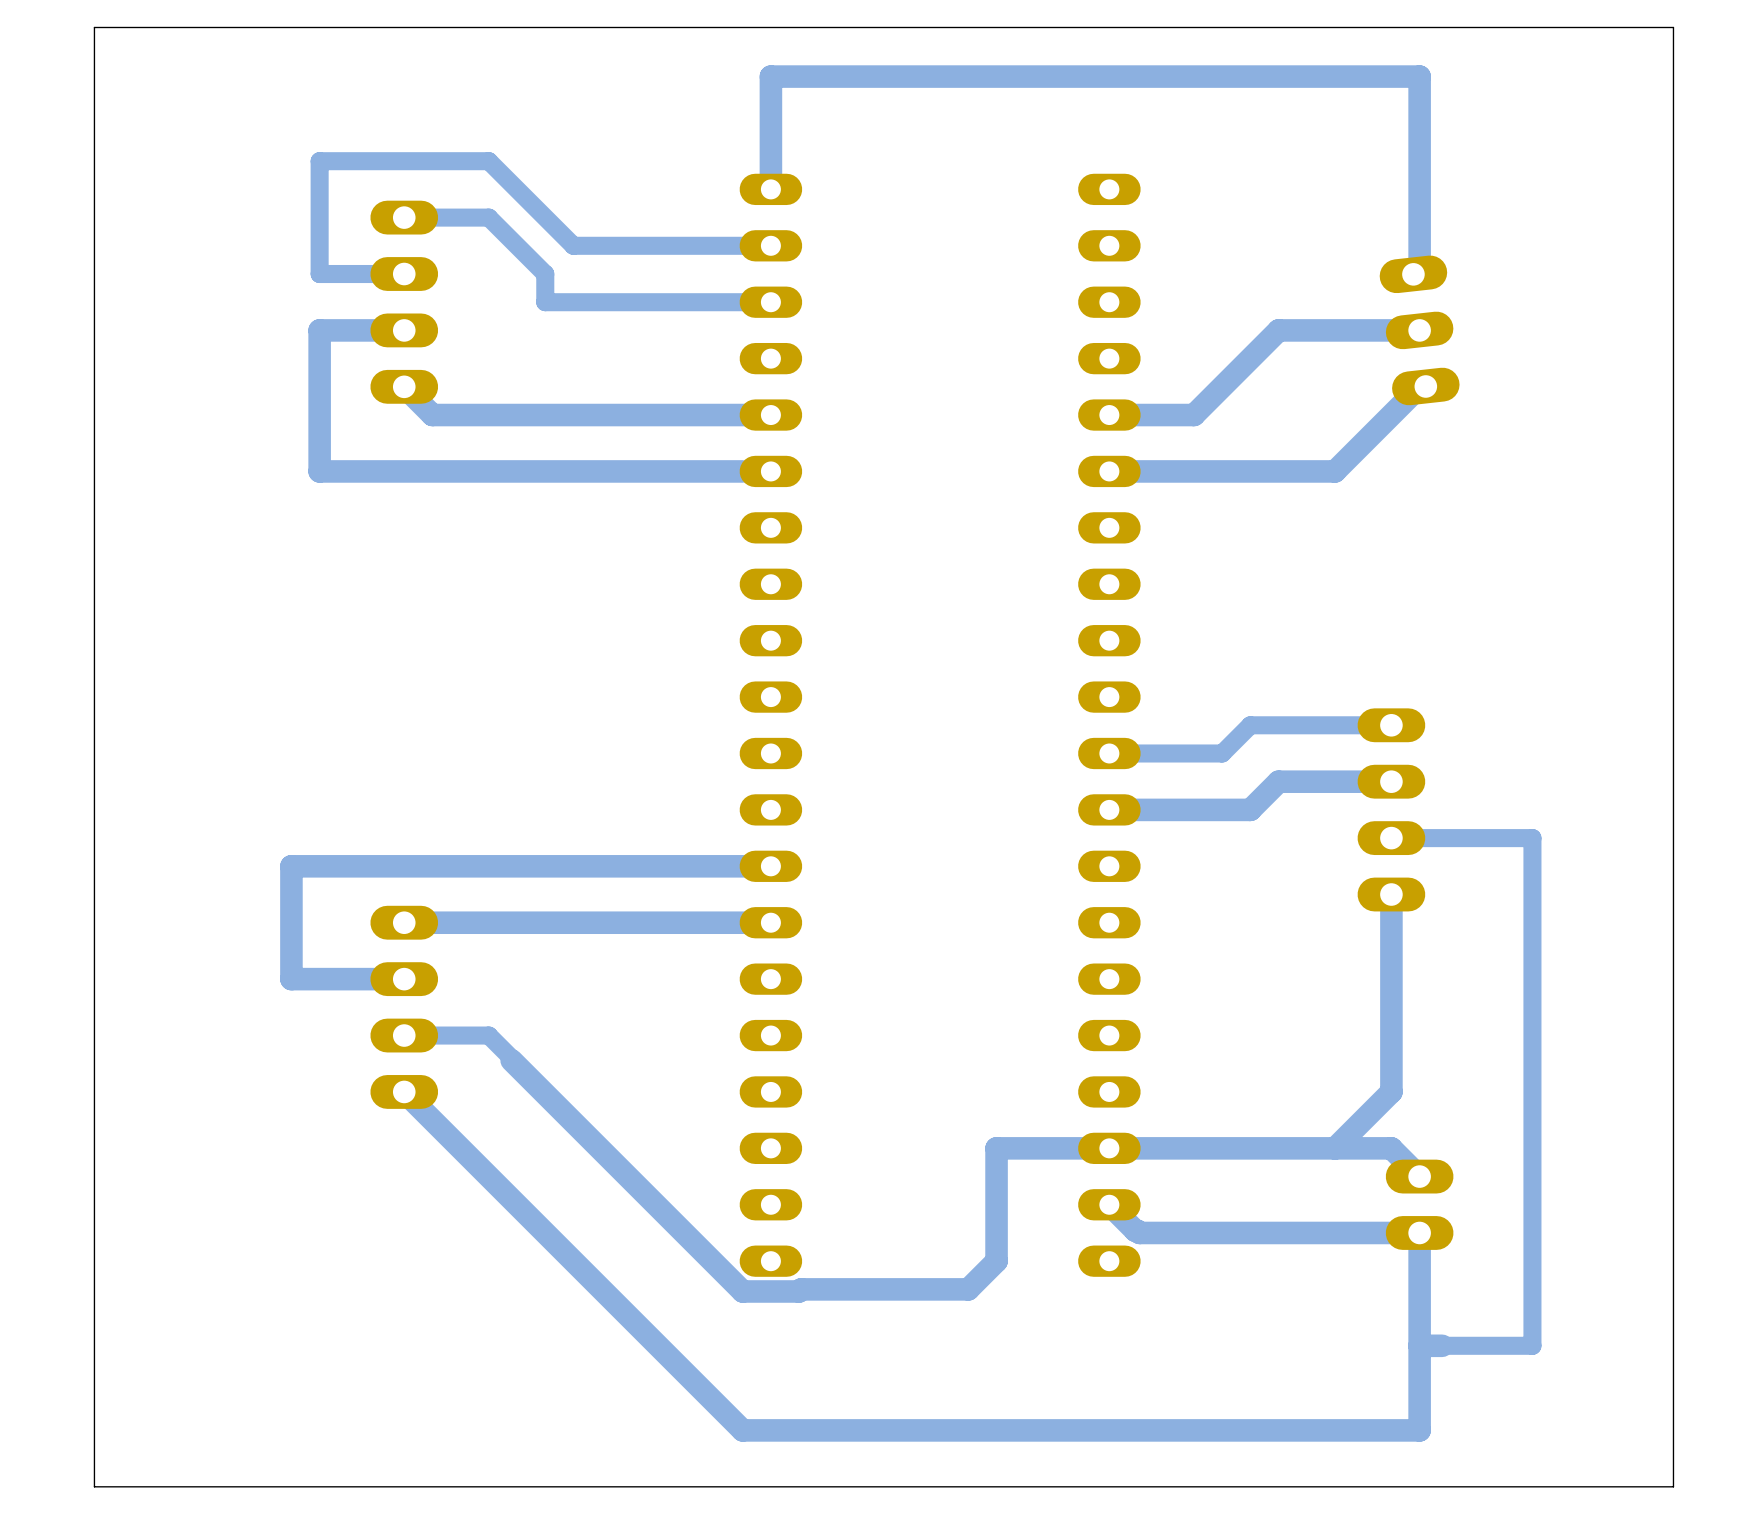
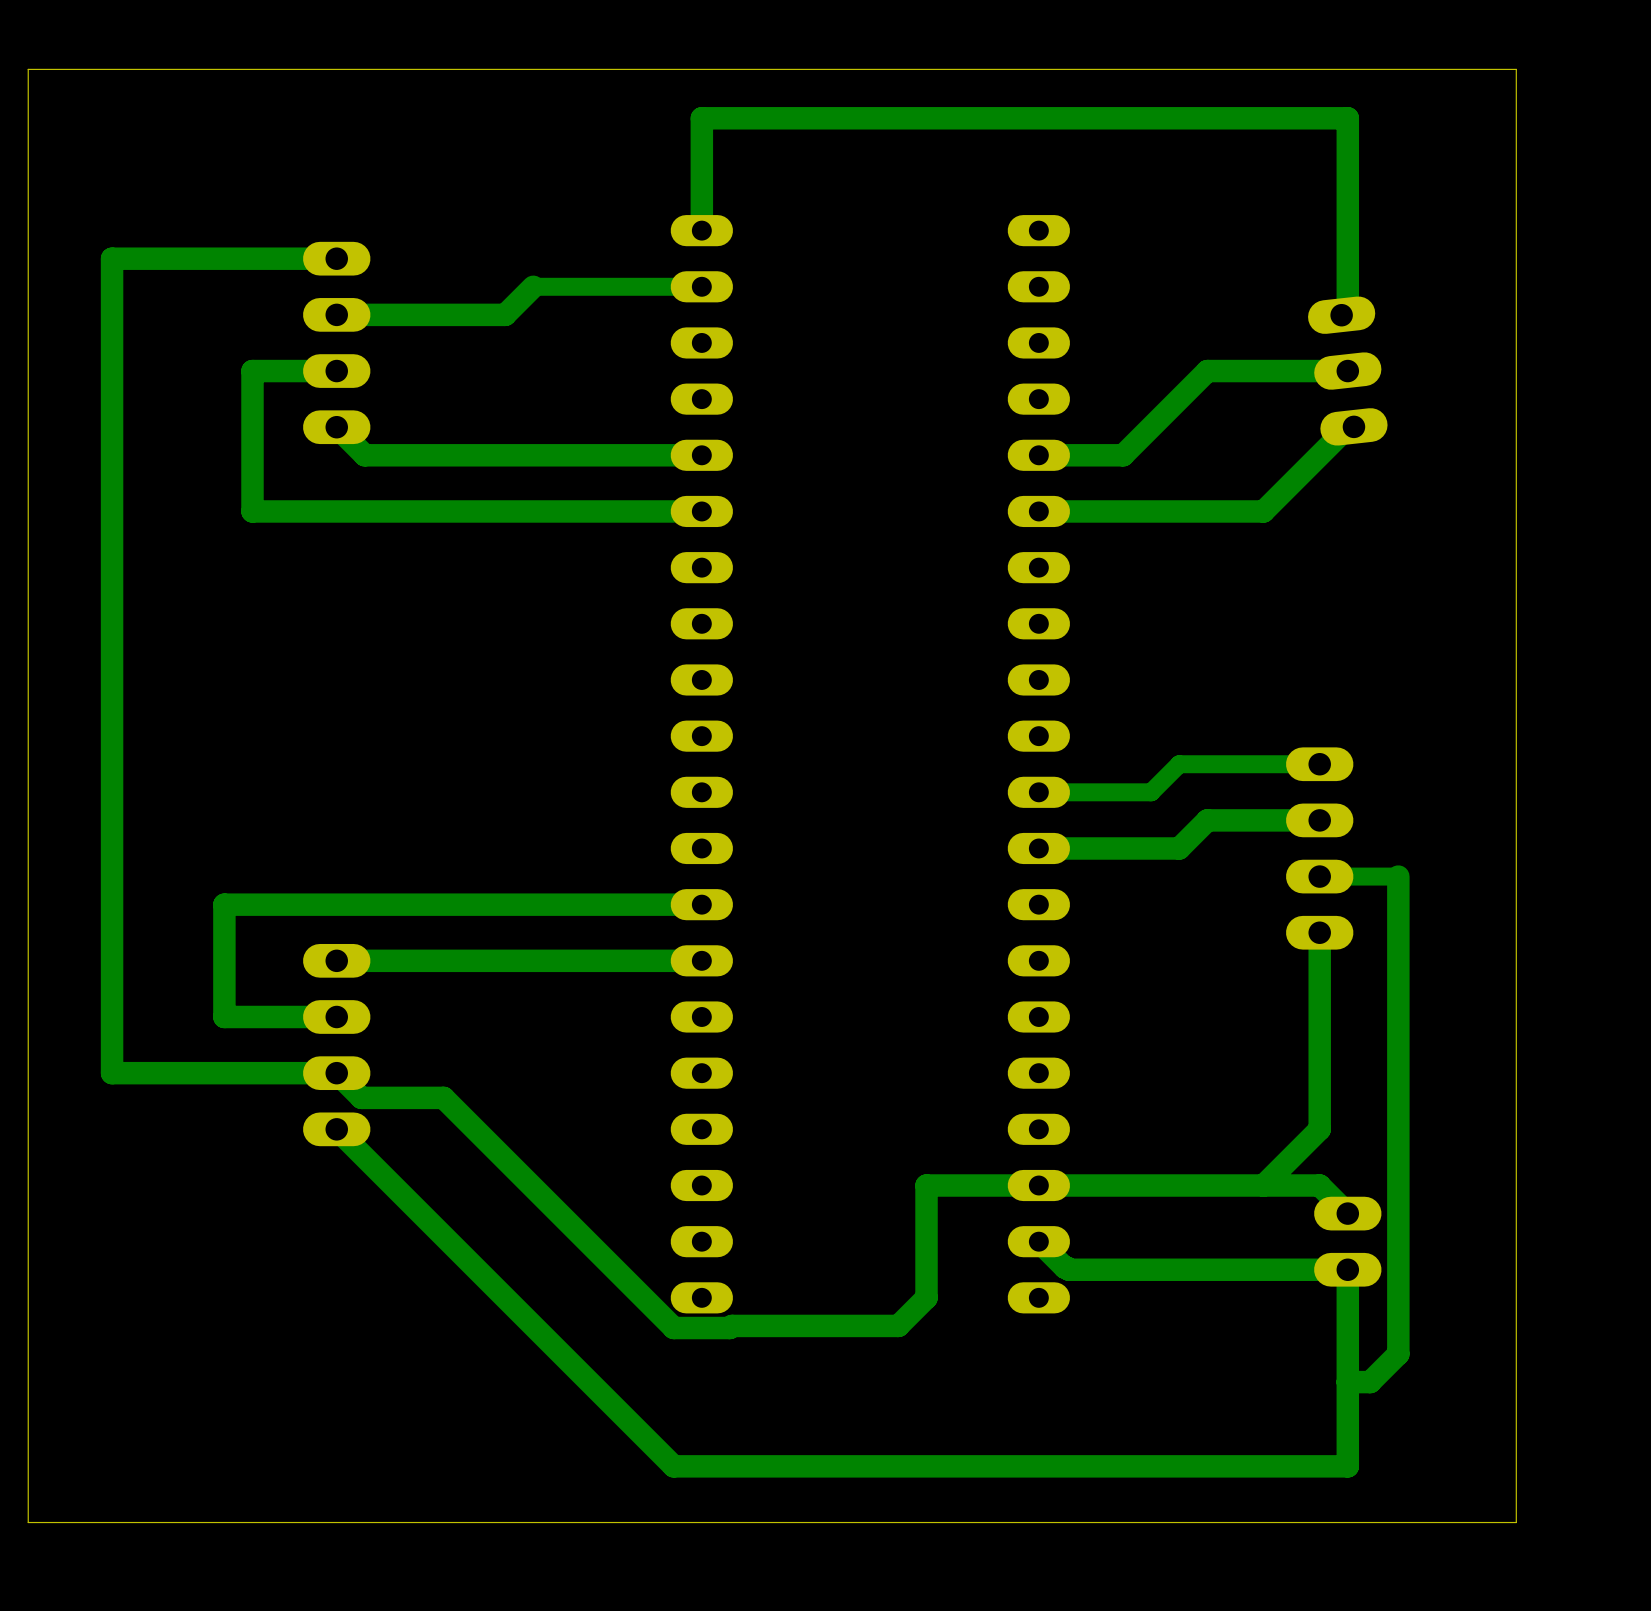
board edge: (1588, 27) (1673, 27) (1673, 1486) (1588, 1486) -> (1516, 69) (1516, 1522)
track: (404, 217) (488, 217) (545, 274) (545, 302) (770, 302) -> (336, 258) (112, 258) (112, 1073) (336, 1073) (361, 1097) (443, 1097)
track: (601, 245) (573, 245) (488, 161) (319, 161) (319, 274) (404, 274) -> (533, 286) (505, 314) (336, 314)
track: (1470, 838) (1532, 838) (1532, 1345) (1442, 1345) -> (1398, 876) (1398, 1354) (1370, 1382)
track: (404, 1035) (488, 1035) (511, 1060) -> none

